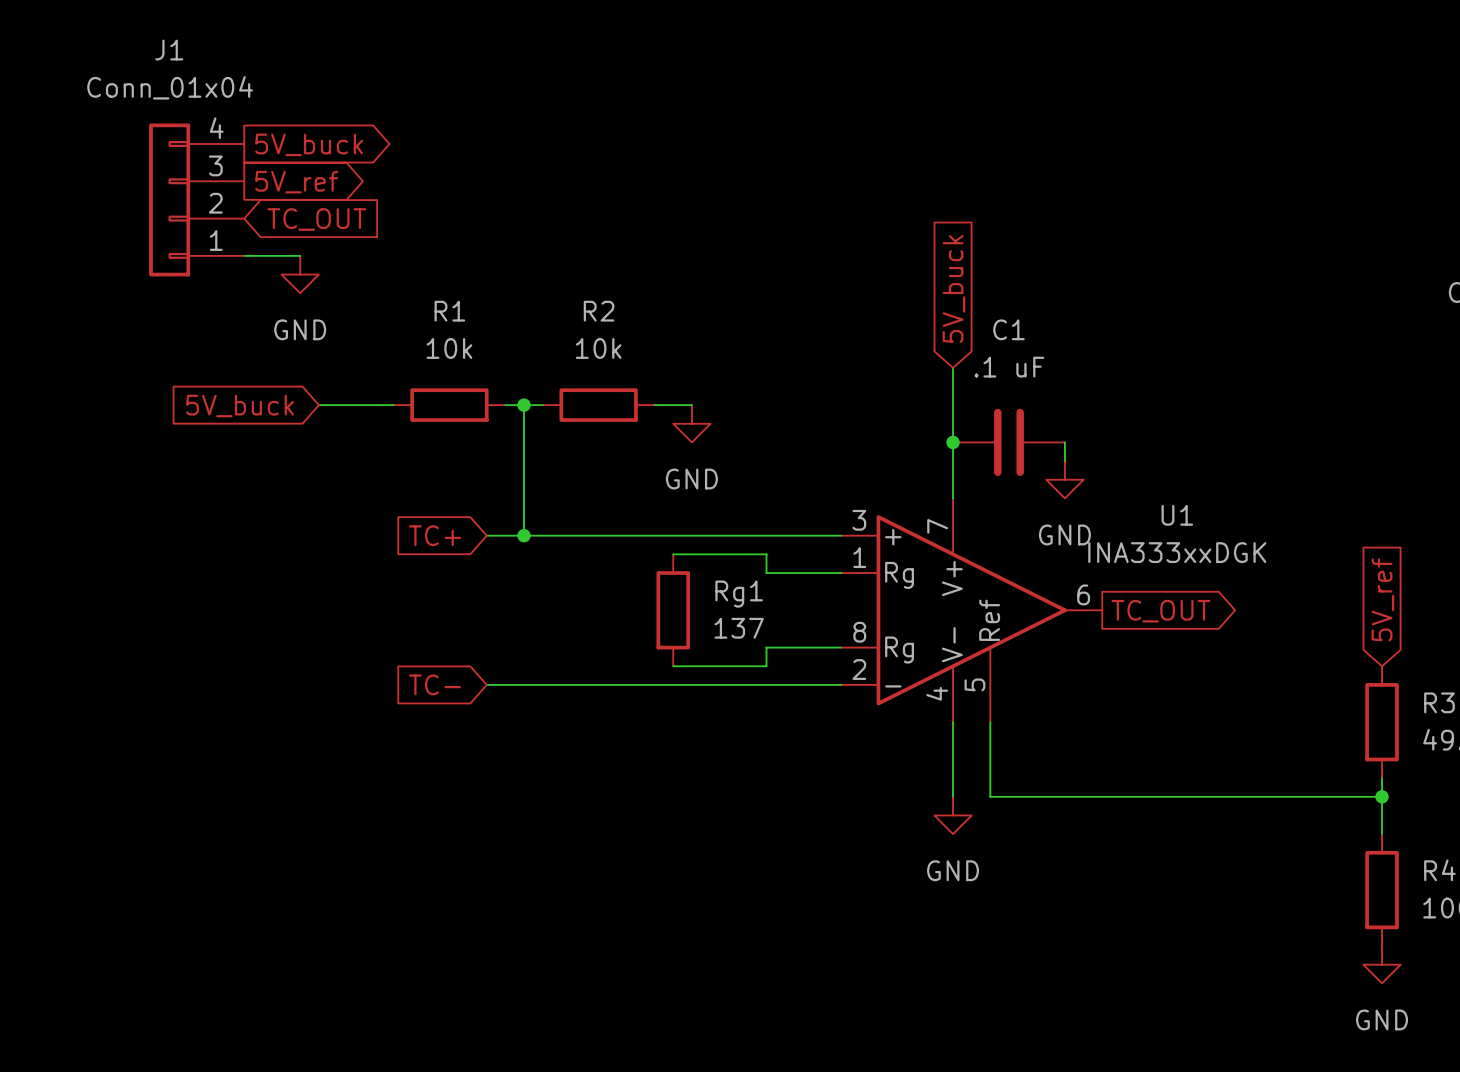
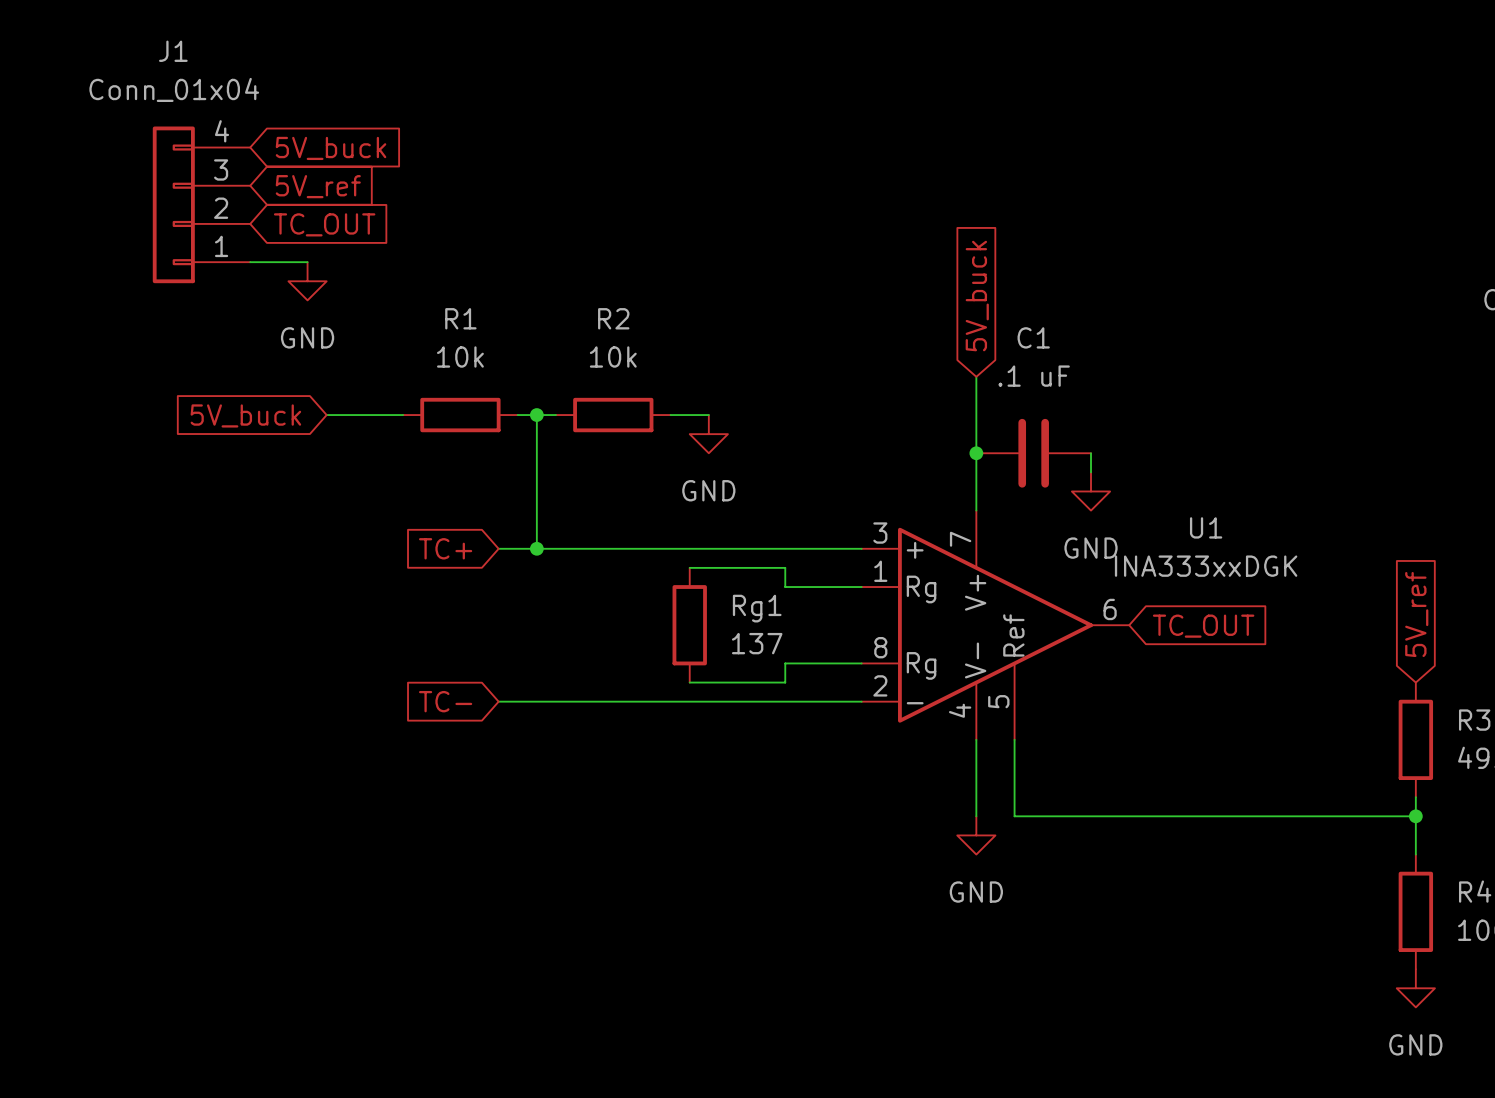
global label shape: output (309, 144) -> input (331, 148)
global label shape: output (296, 182) -> input (318, 186)
global label shape: output (1160, 611) -> input (1203, 626)

